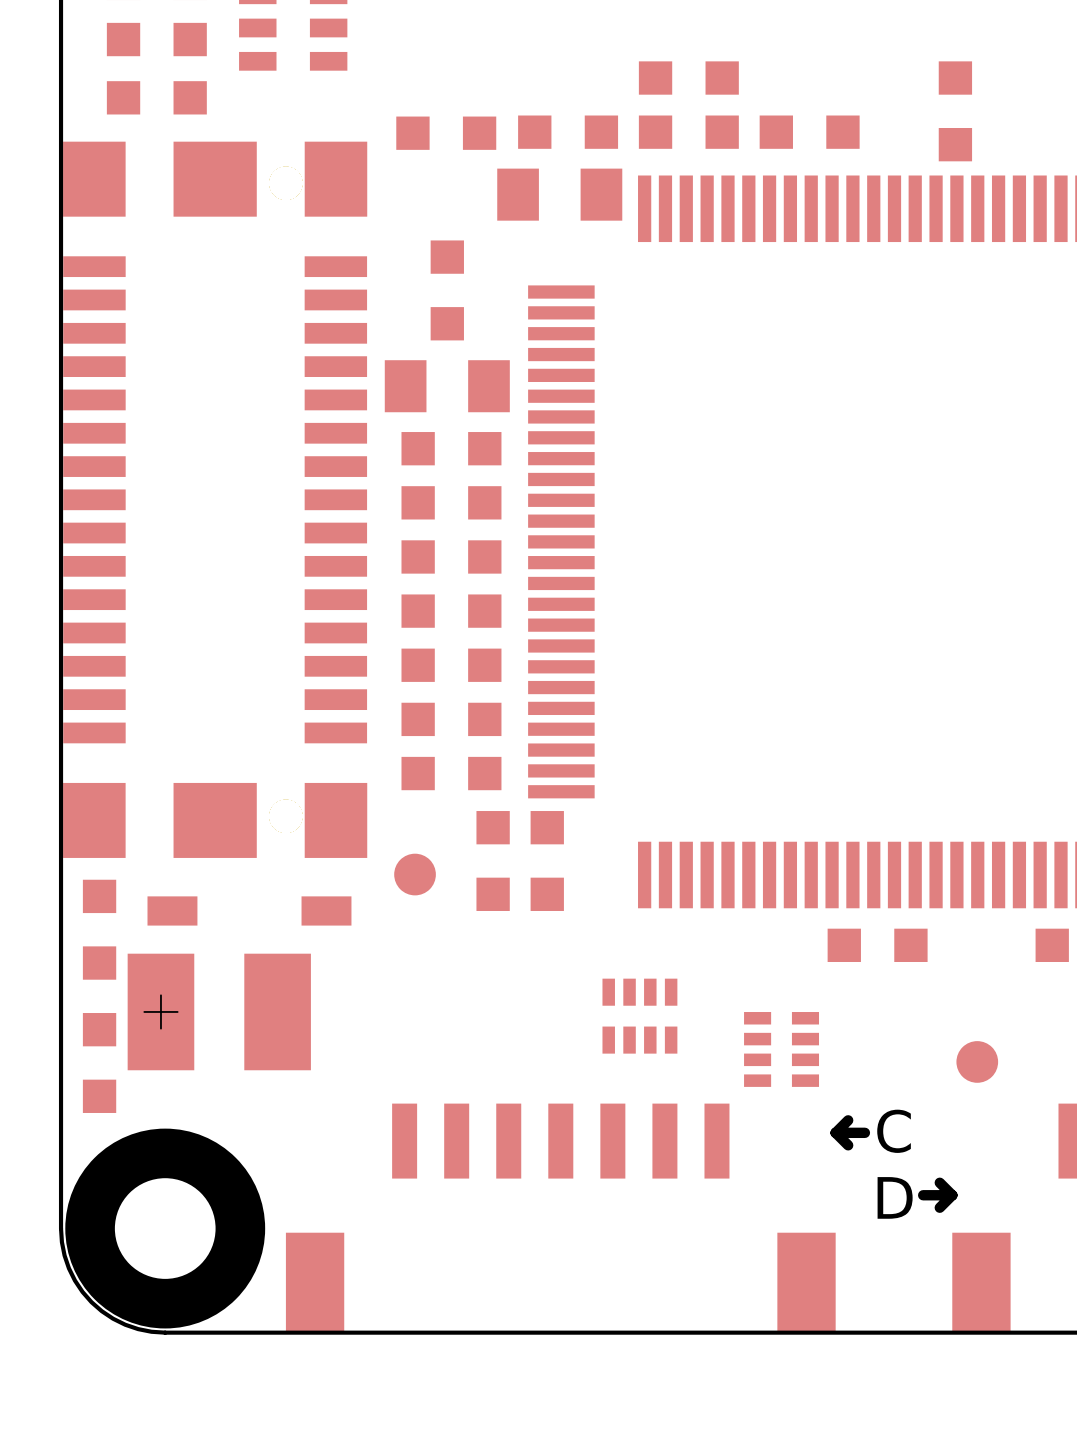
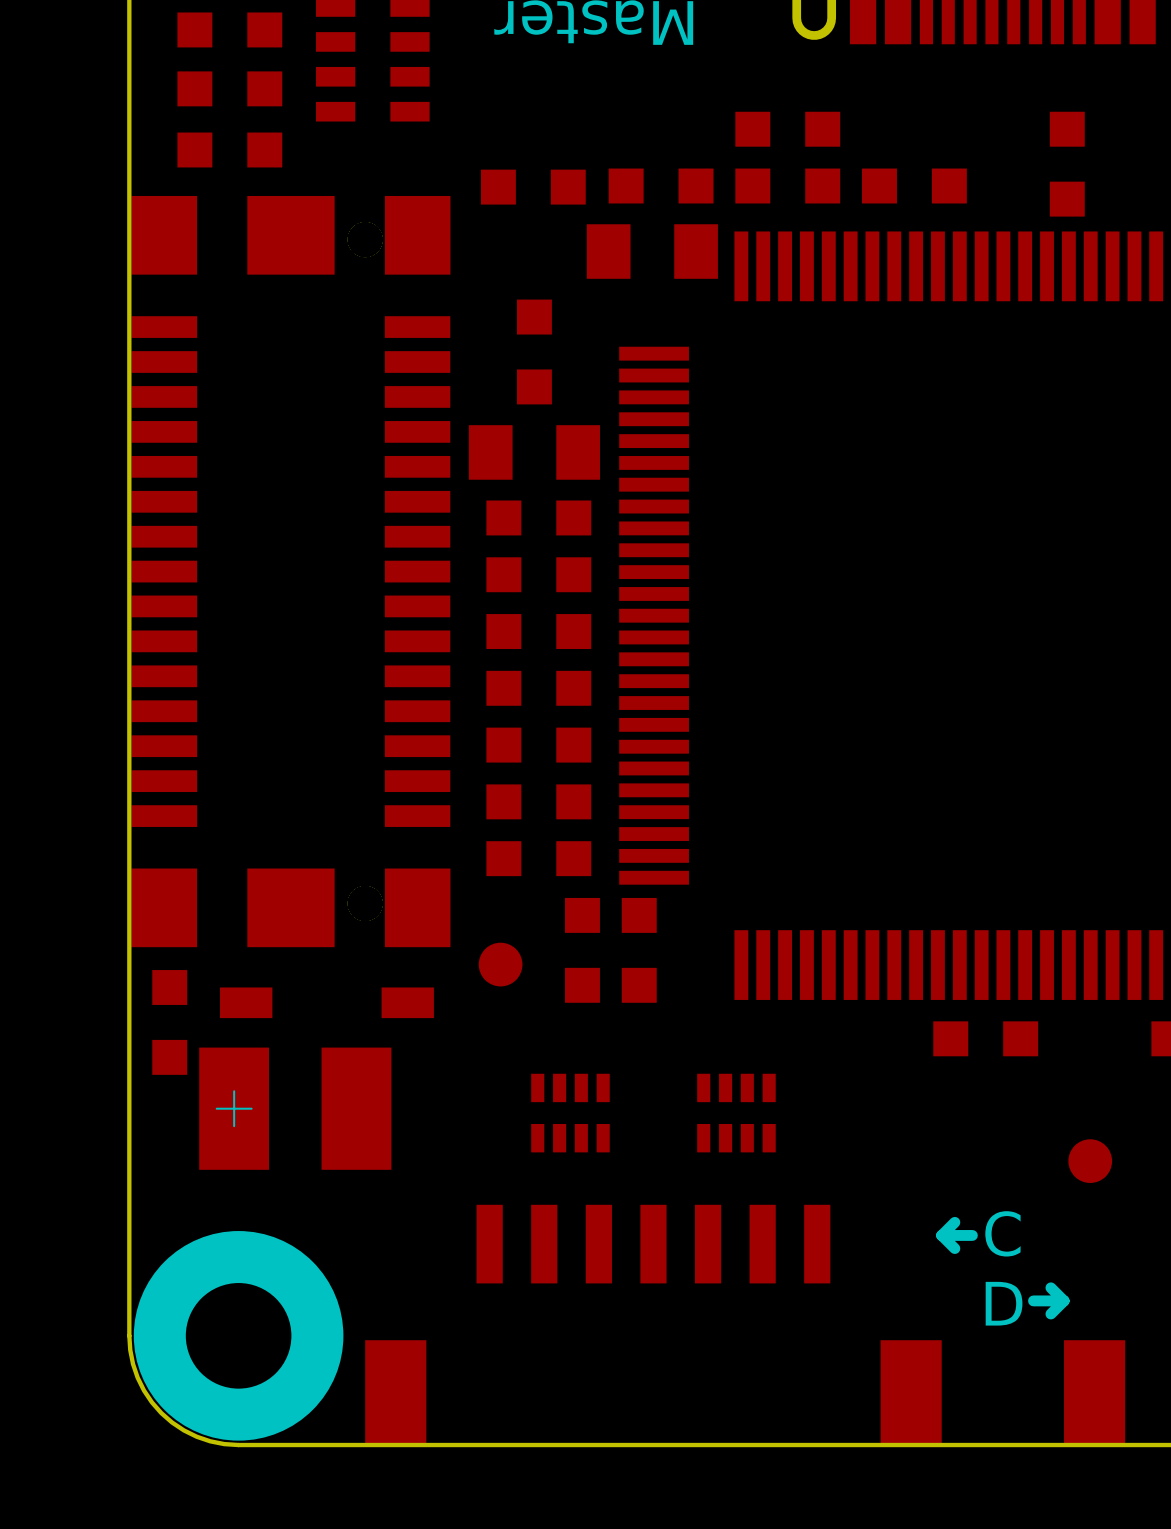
part: none -> (570, 1113)
part: (781, 1049) -> none
part: (99, 1062) -> none

